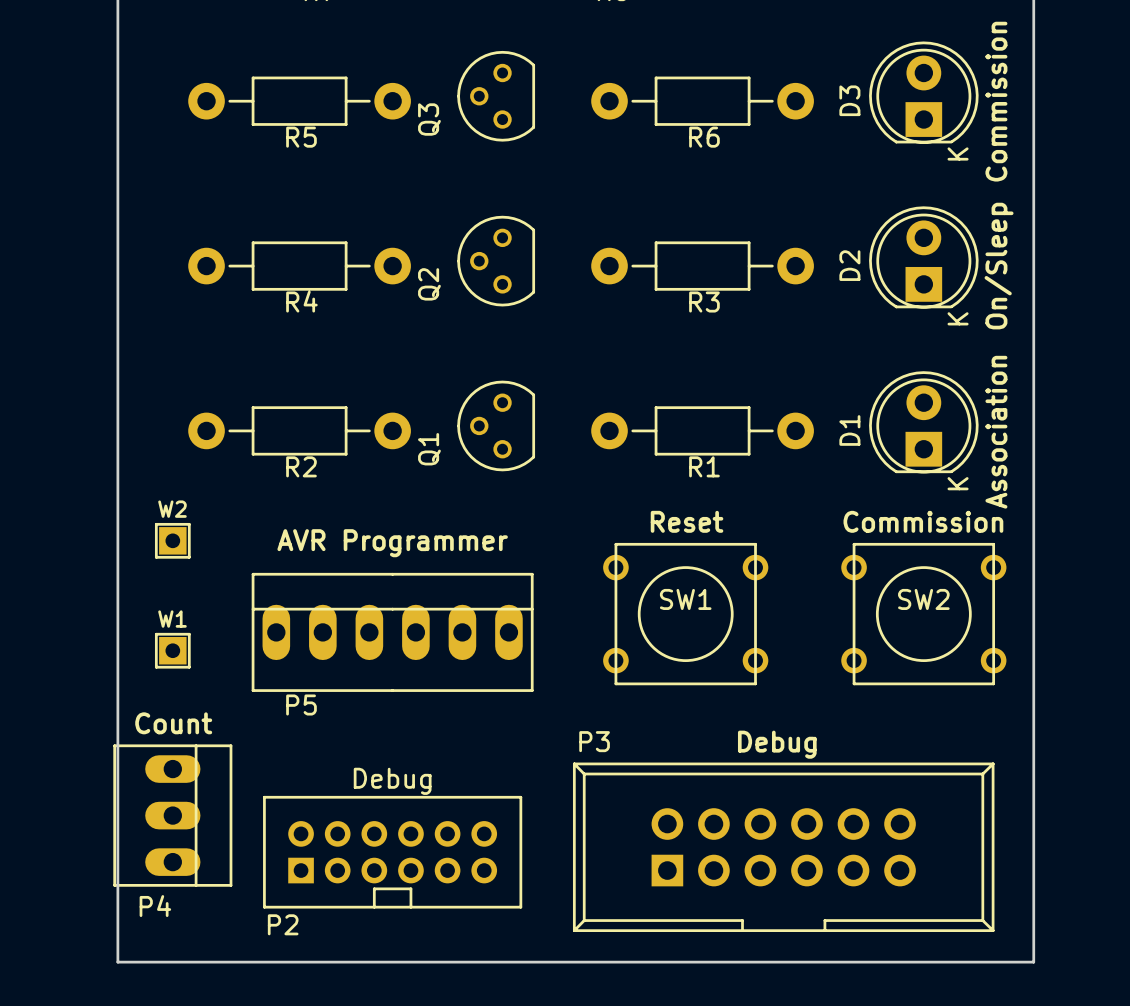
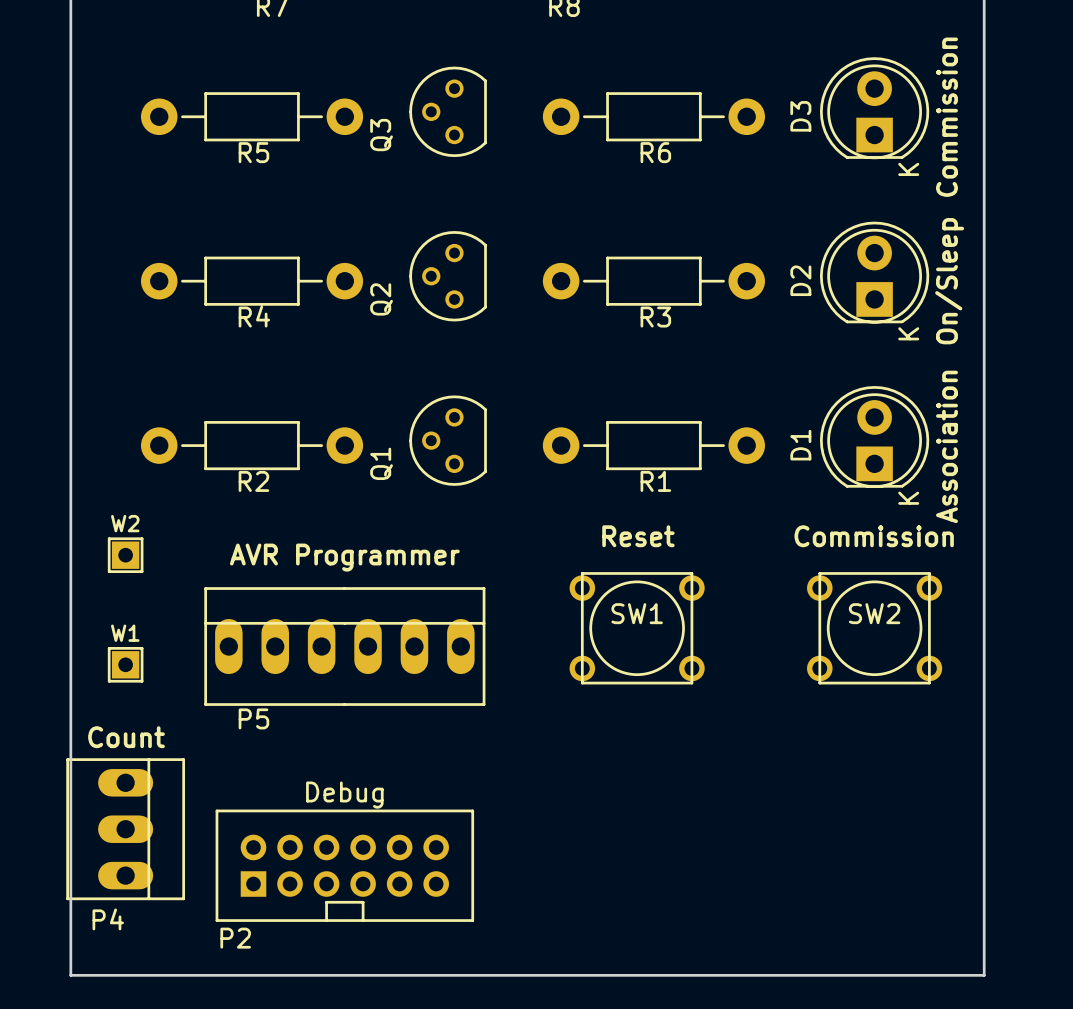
SW1 footprint: [603, 542, 769, 686] -> [569, 572, 705, 685]
SW2 footprint: [841, 542, 1007, 686] -> [807, 572, 943, 685]
text: Debug (777, 744) -> none
P3: (783, 847) -> none

